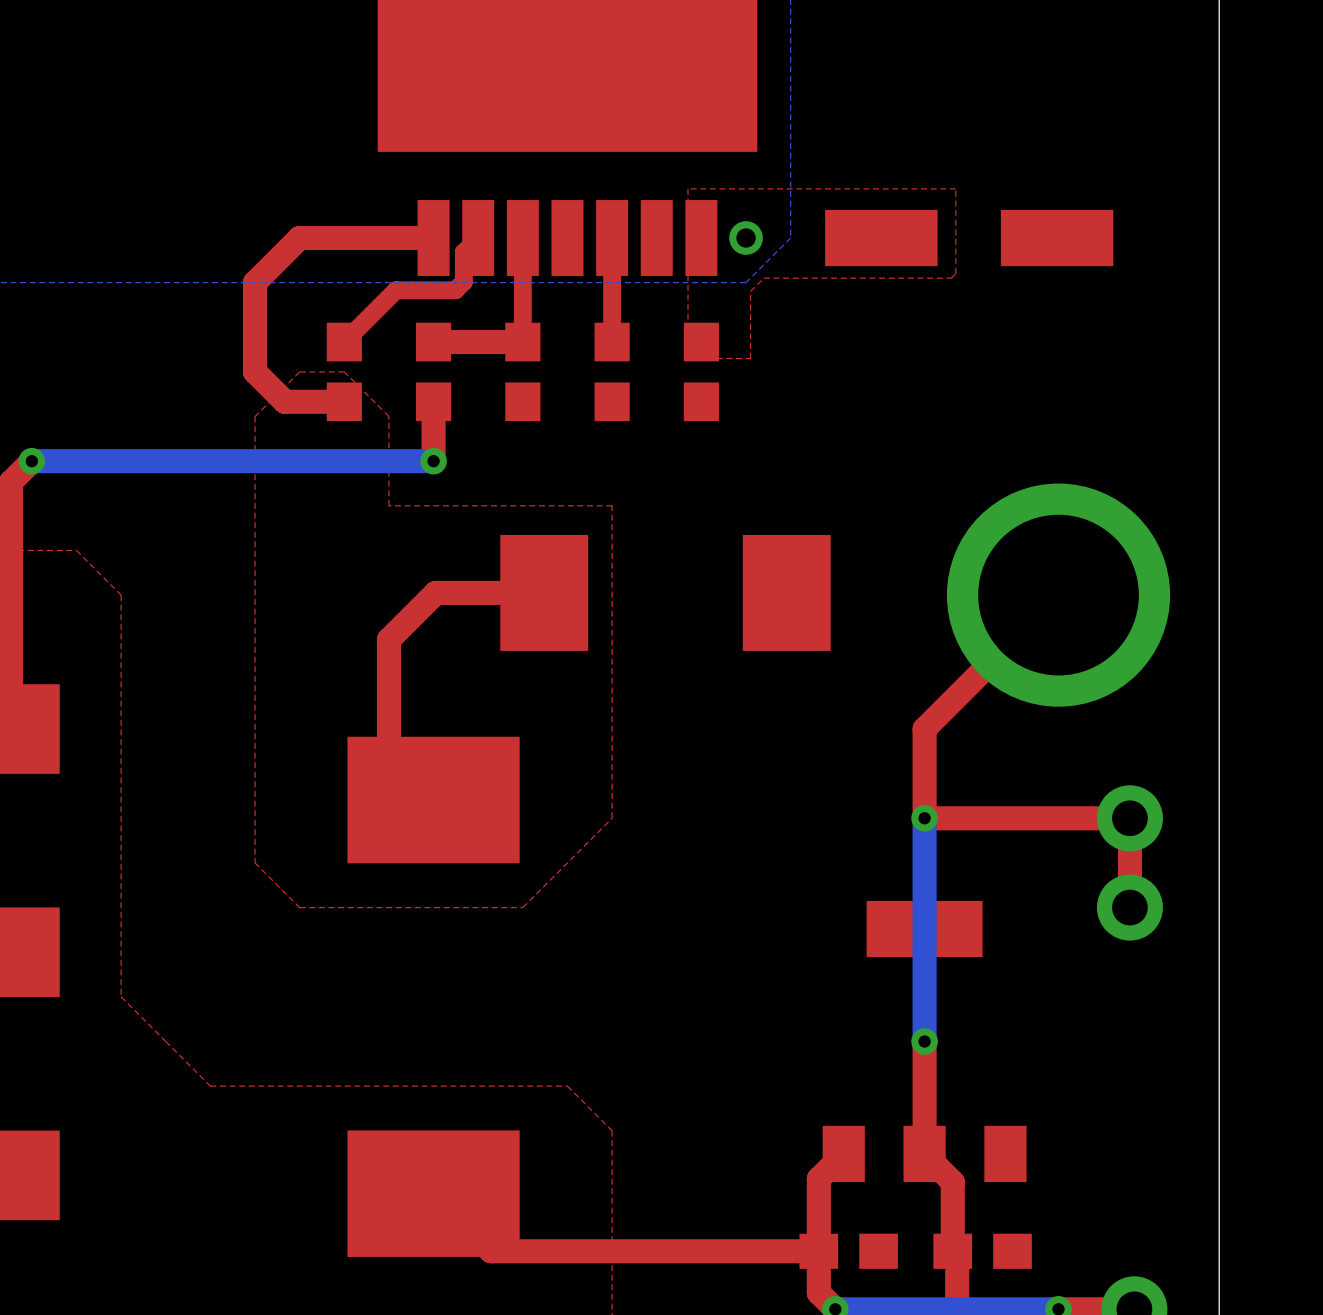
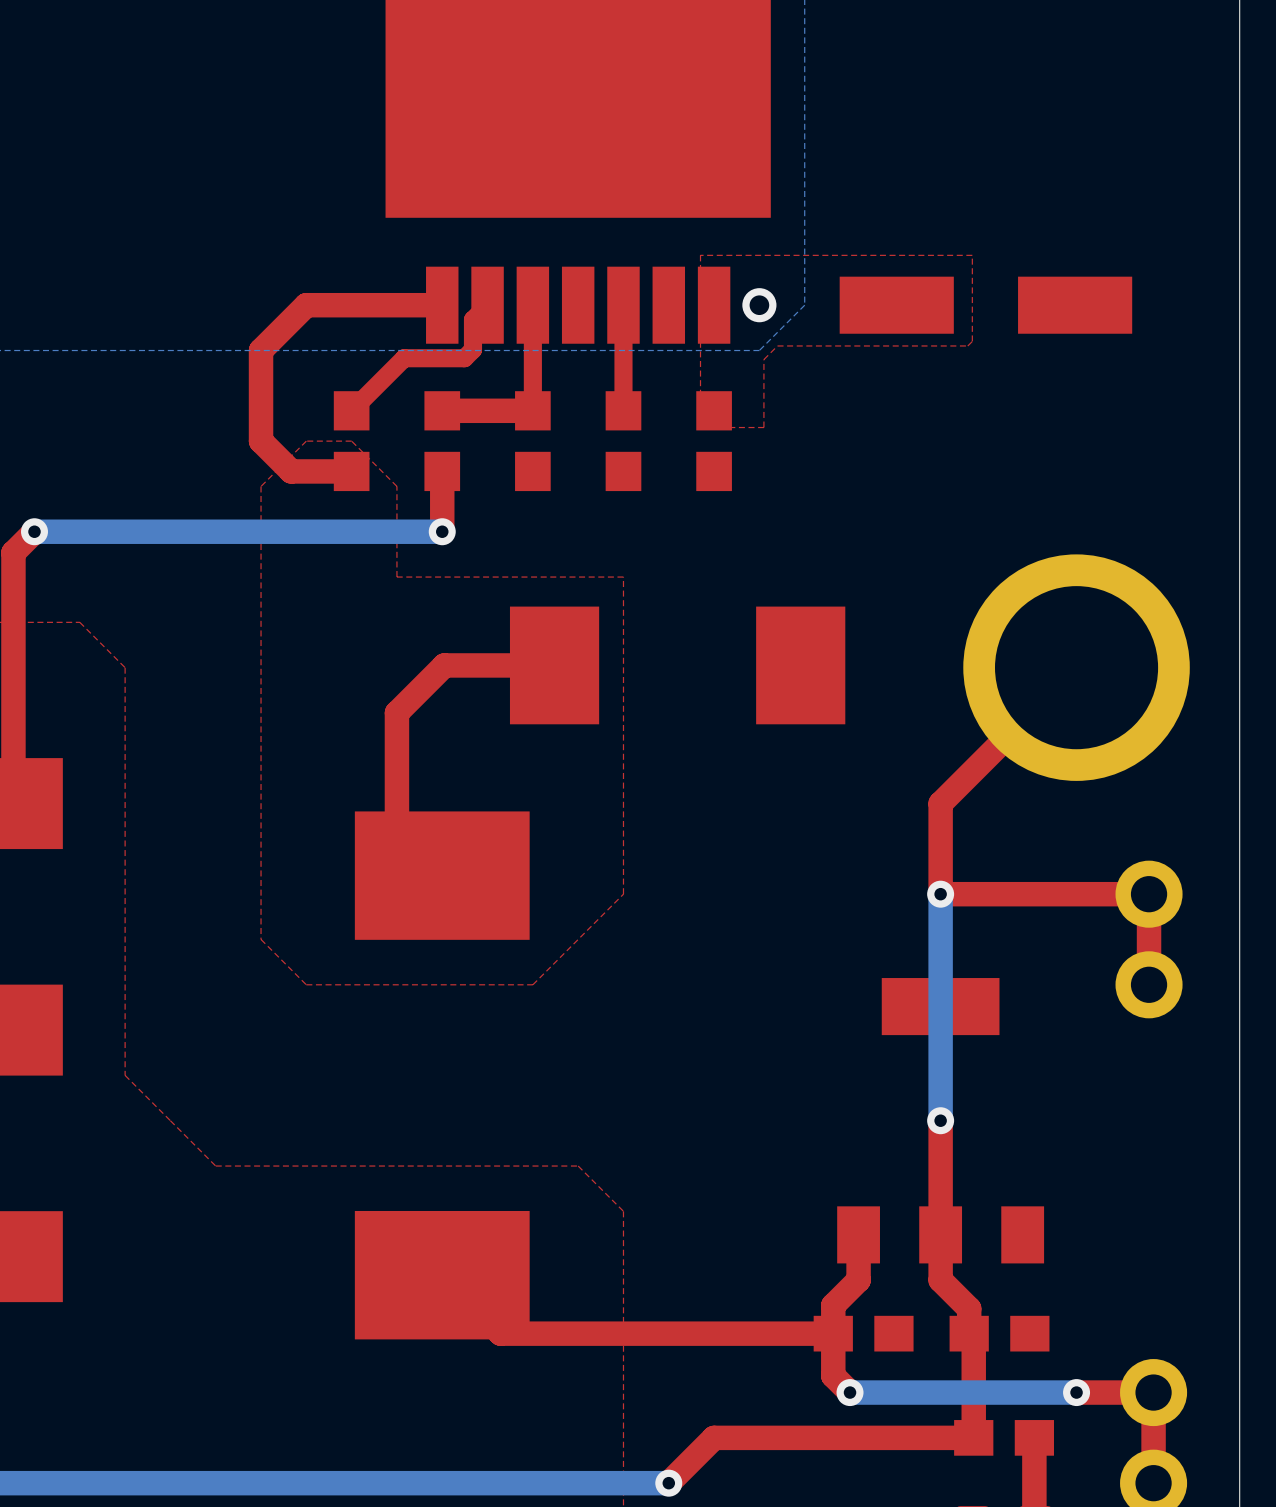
top track: (843, 1153) (818, 1178) (818, 1223) -> (858, 1234) (858, 1280) (833, 1305)
top track: (924, 1153) (952, 1182) (952, 1226) -> (940, 1234) (940, 1280) (969, 1308)

